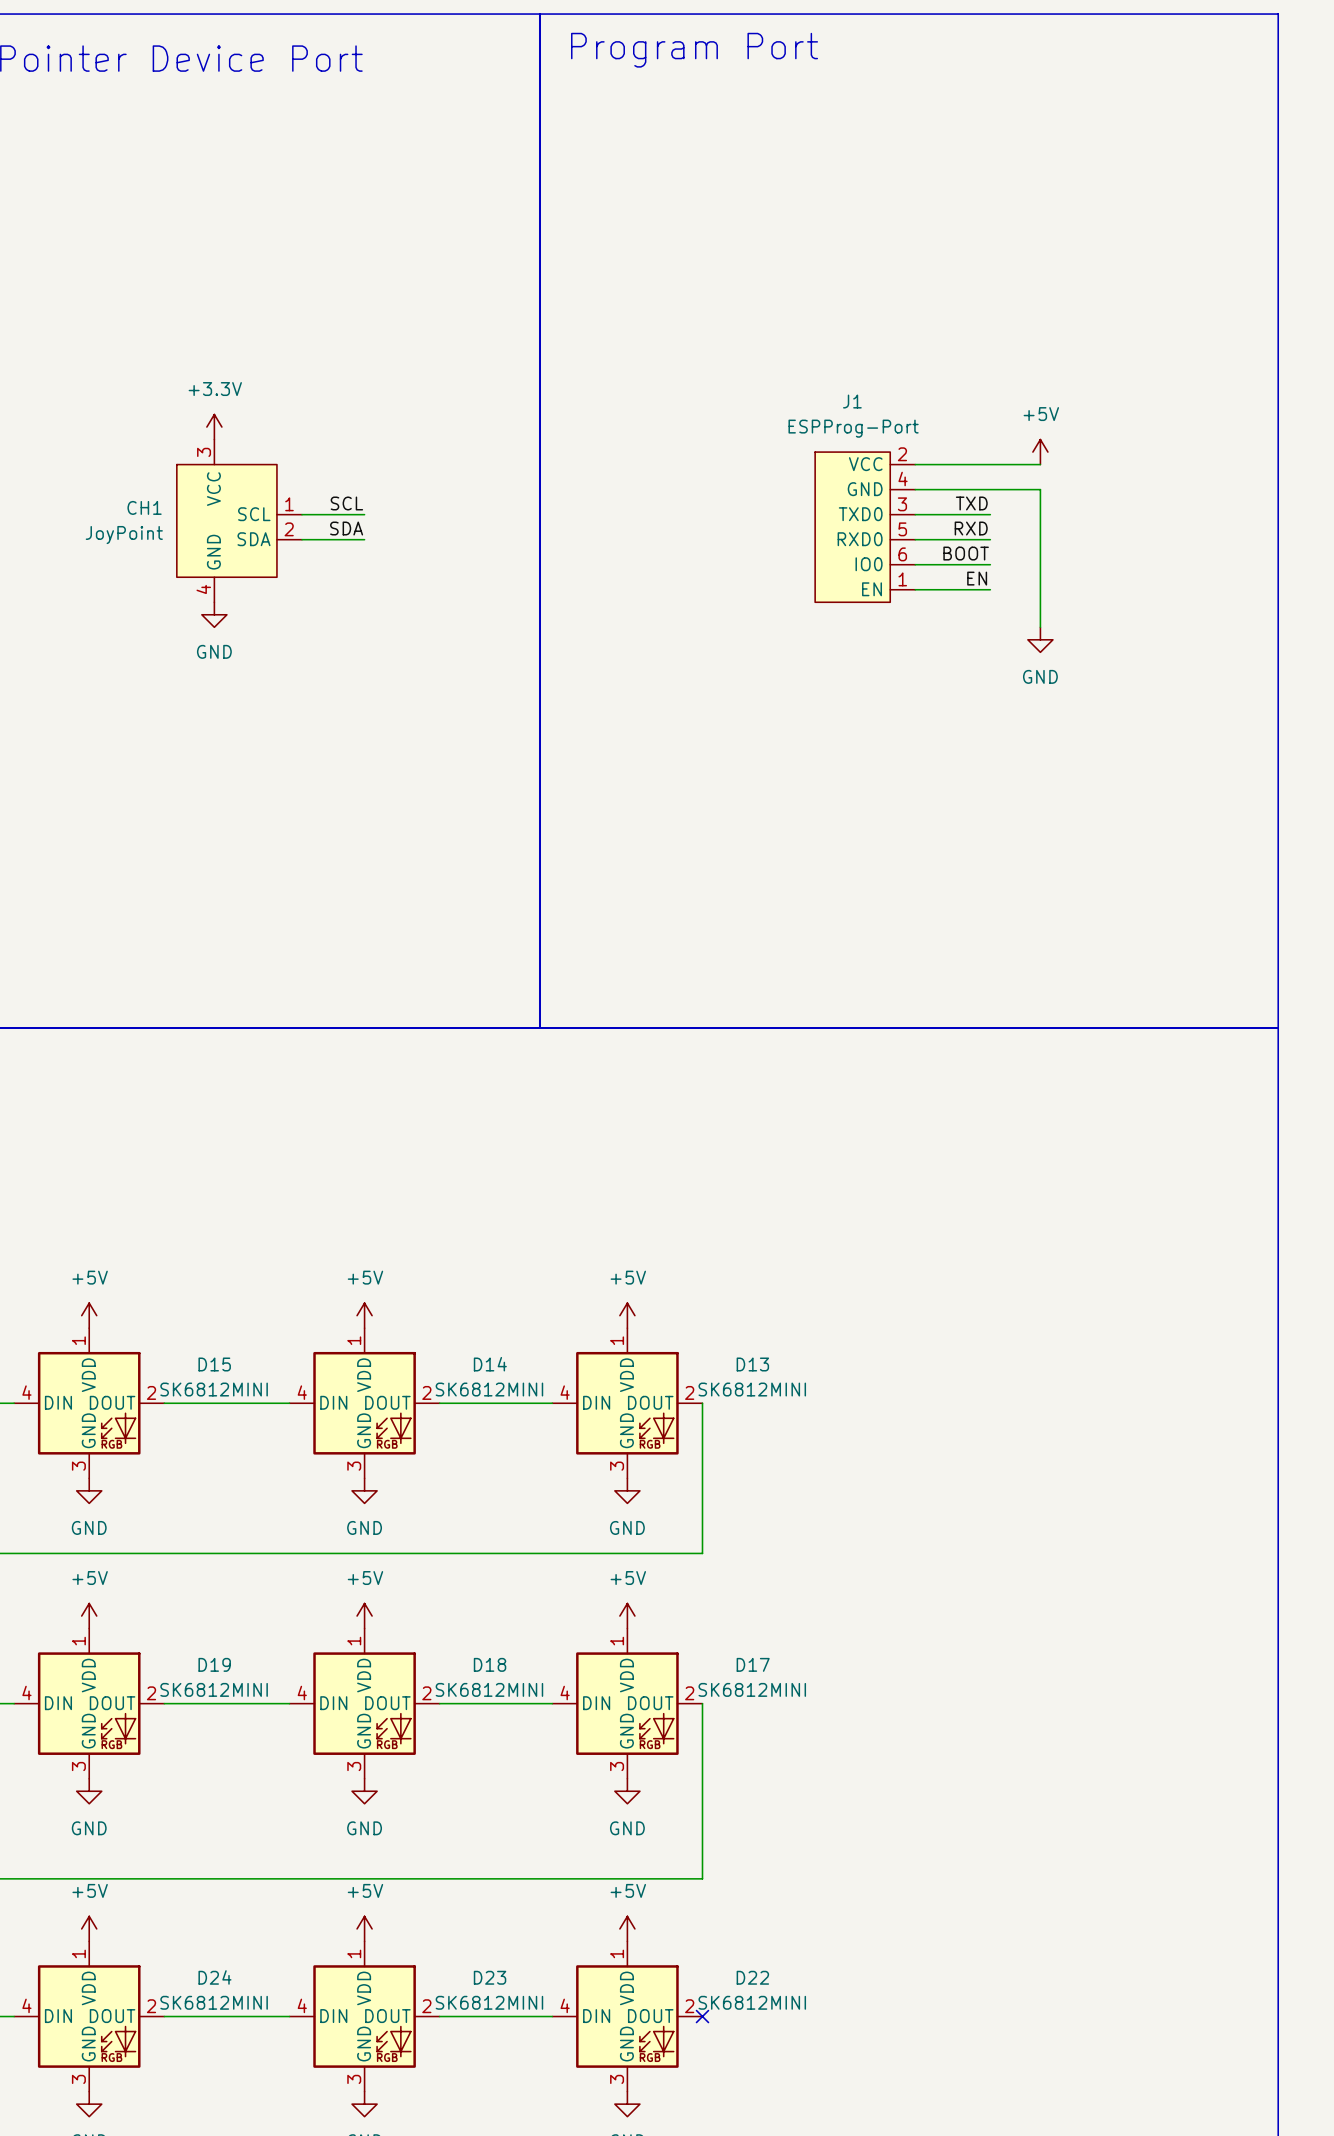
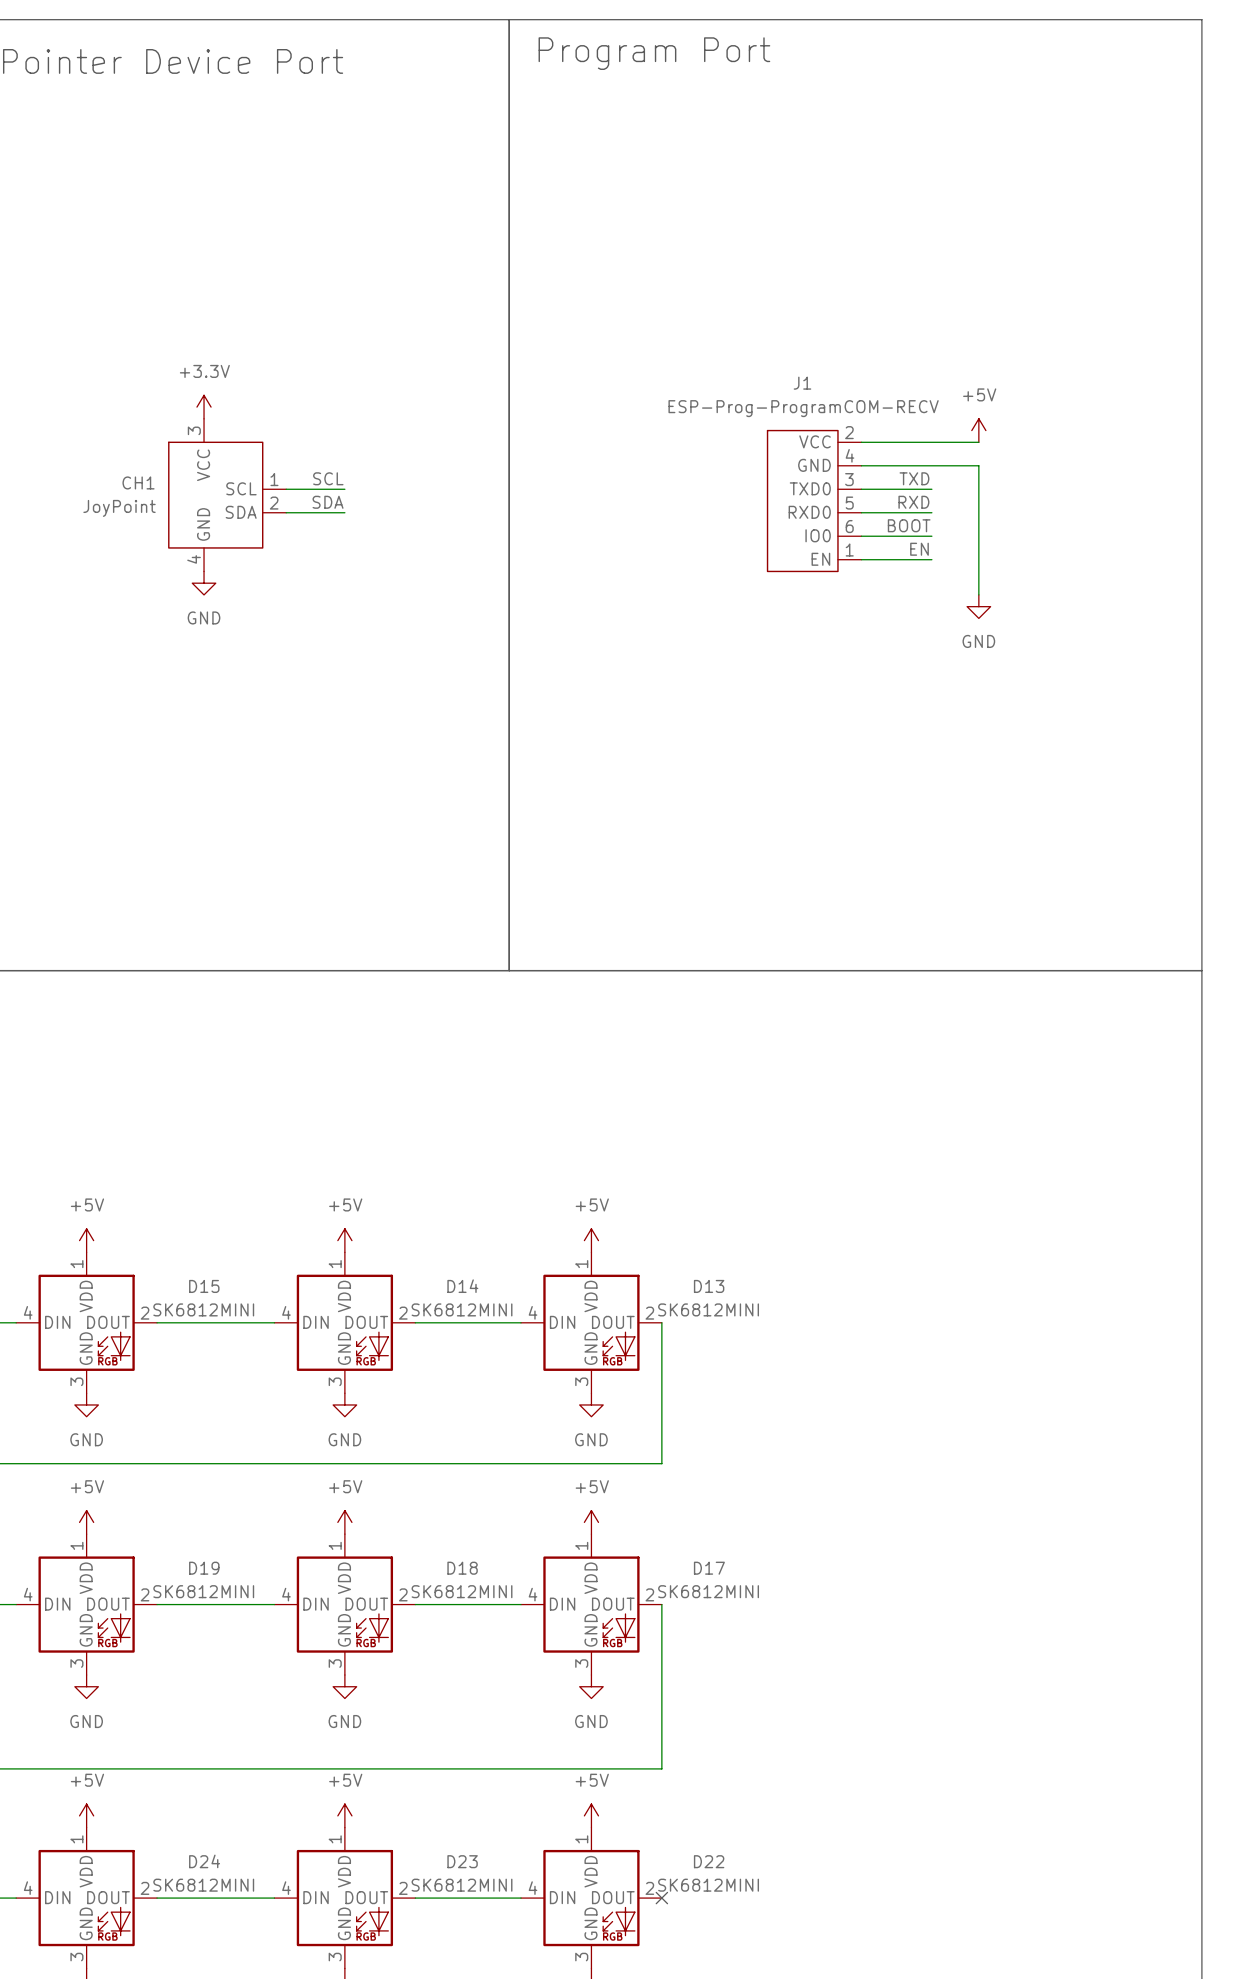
J1 value: ESPProg-Port (853, 428) -> ESP-Prog-ProgramCOM-RECV (803, 408)

